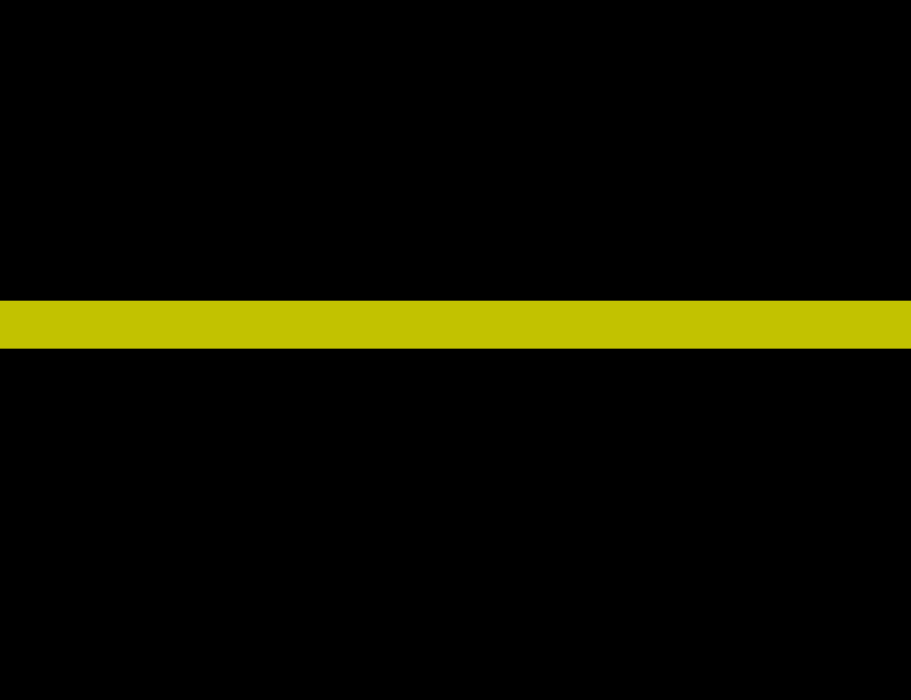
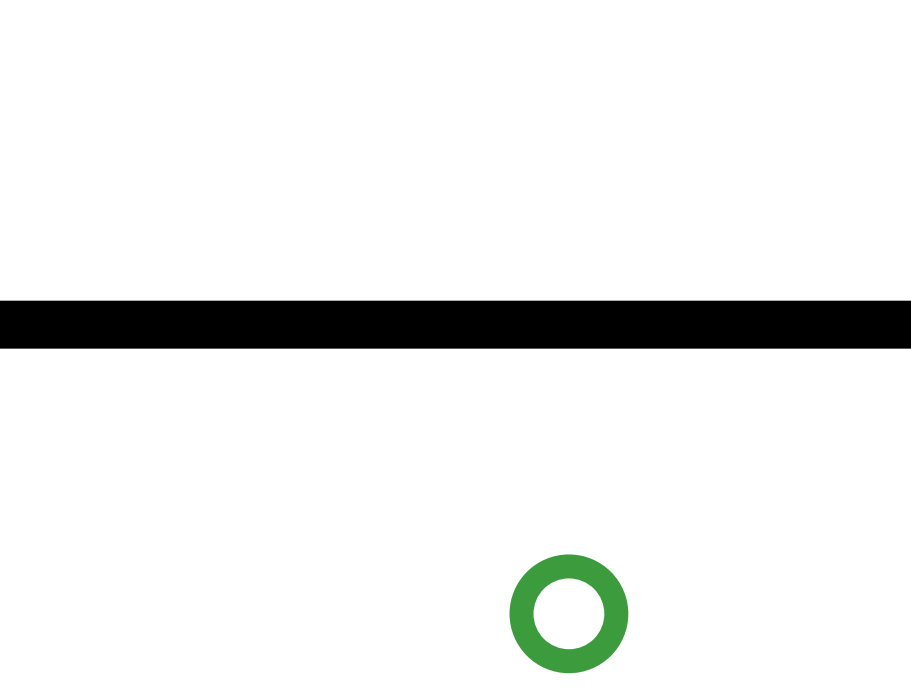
via: none -> (568, 613)

